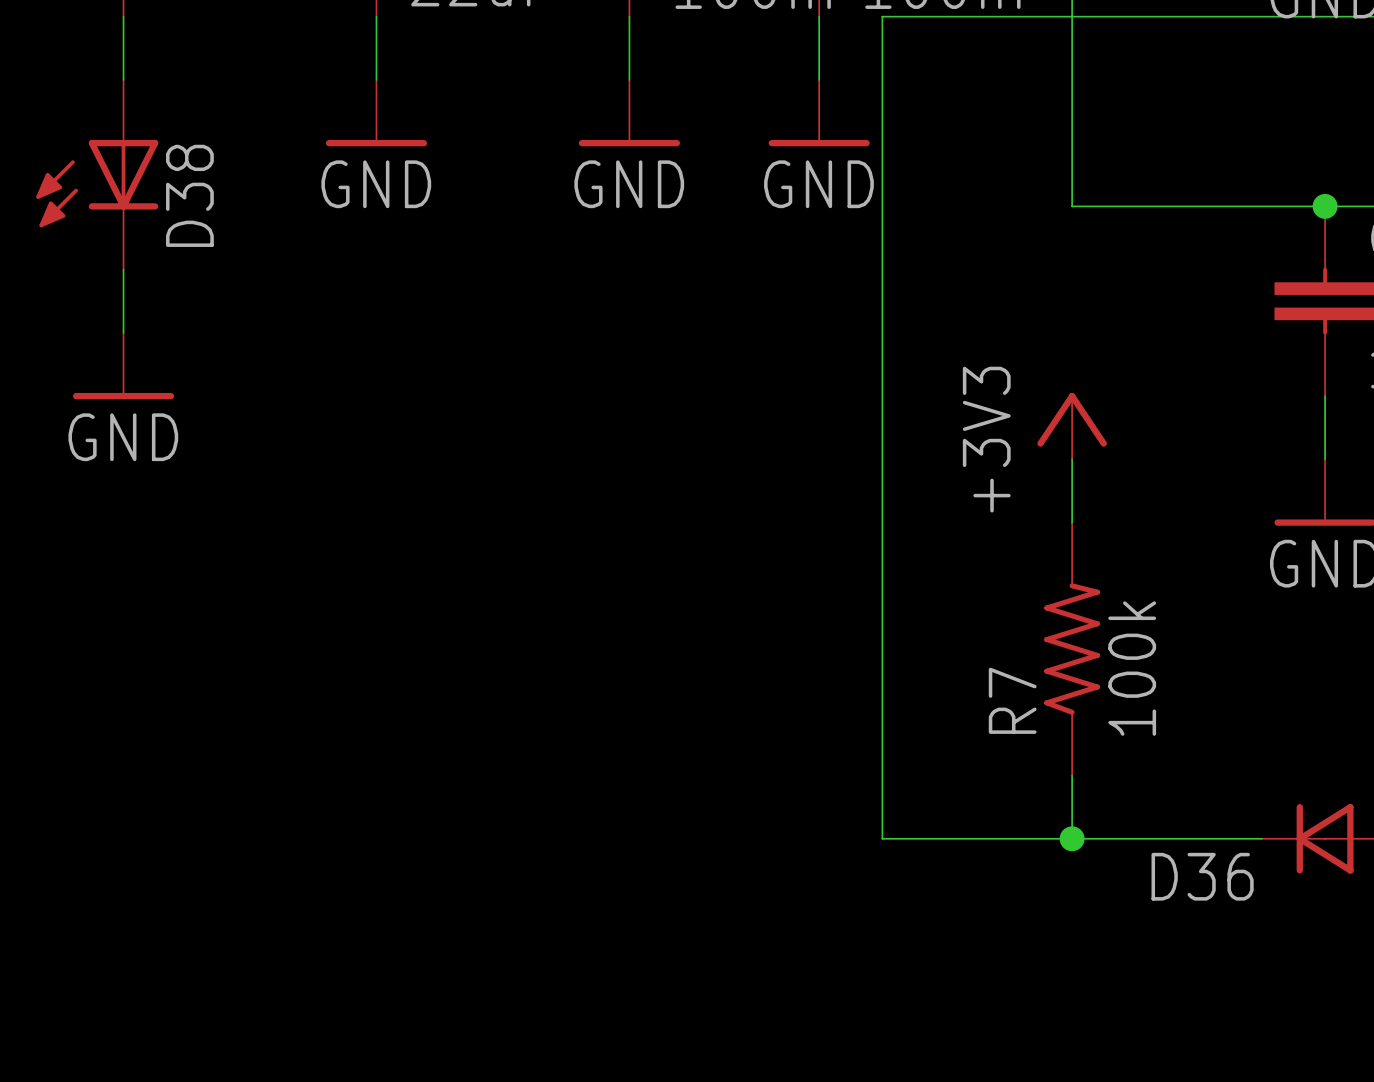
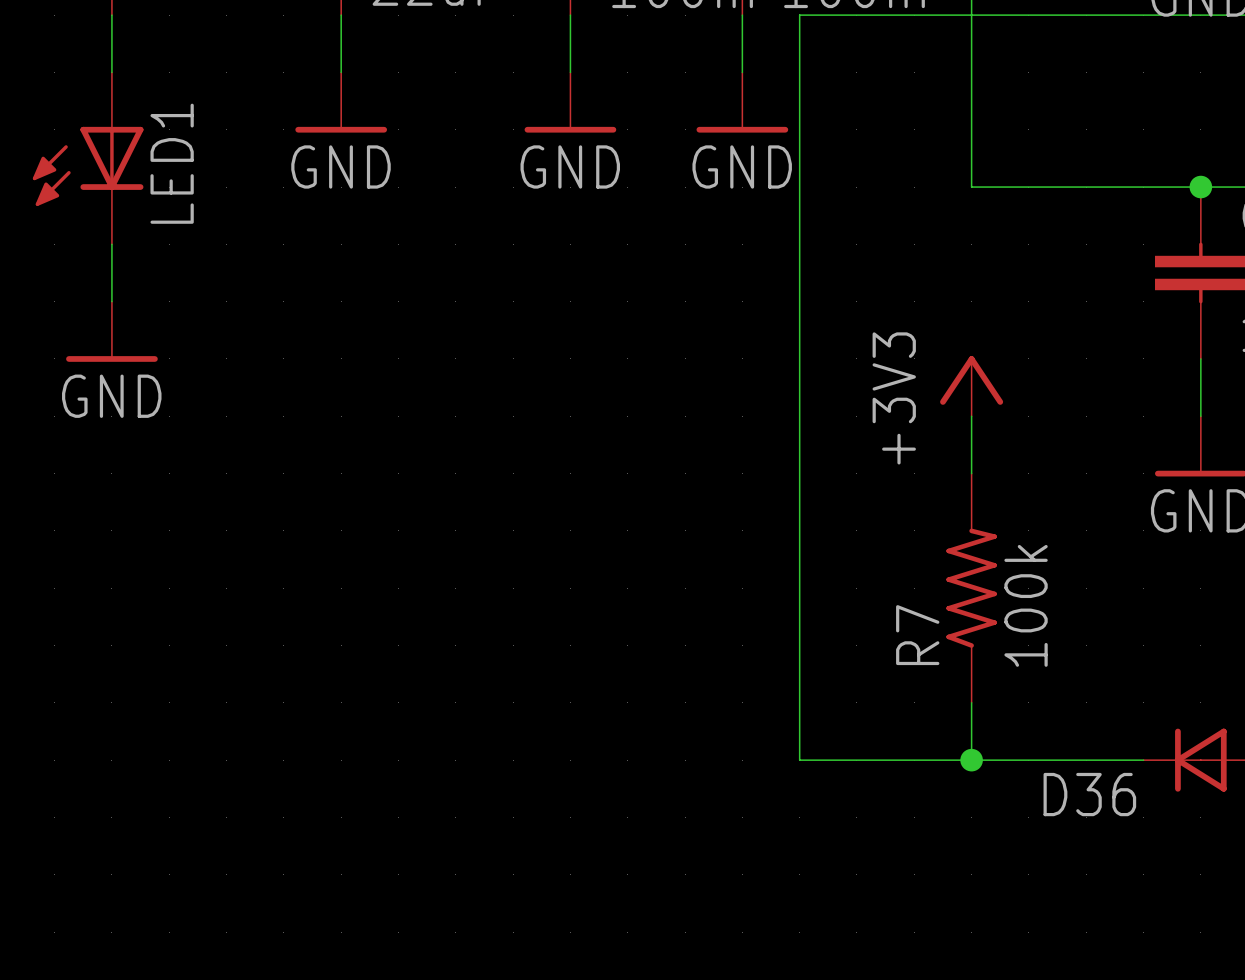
D38 name: D38 (189, 195) -> LED1 (172, 163)

